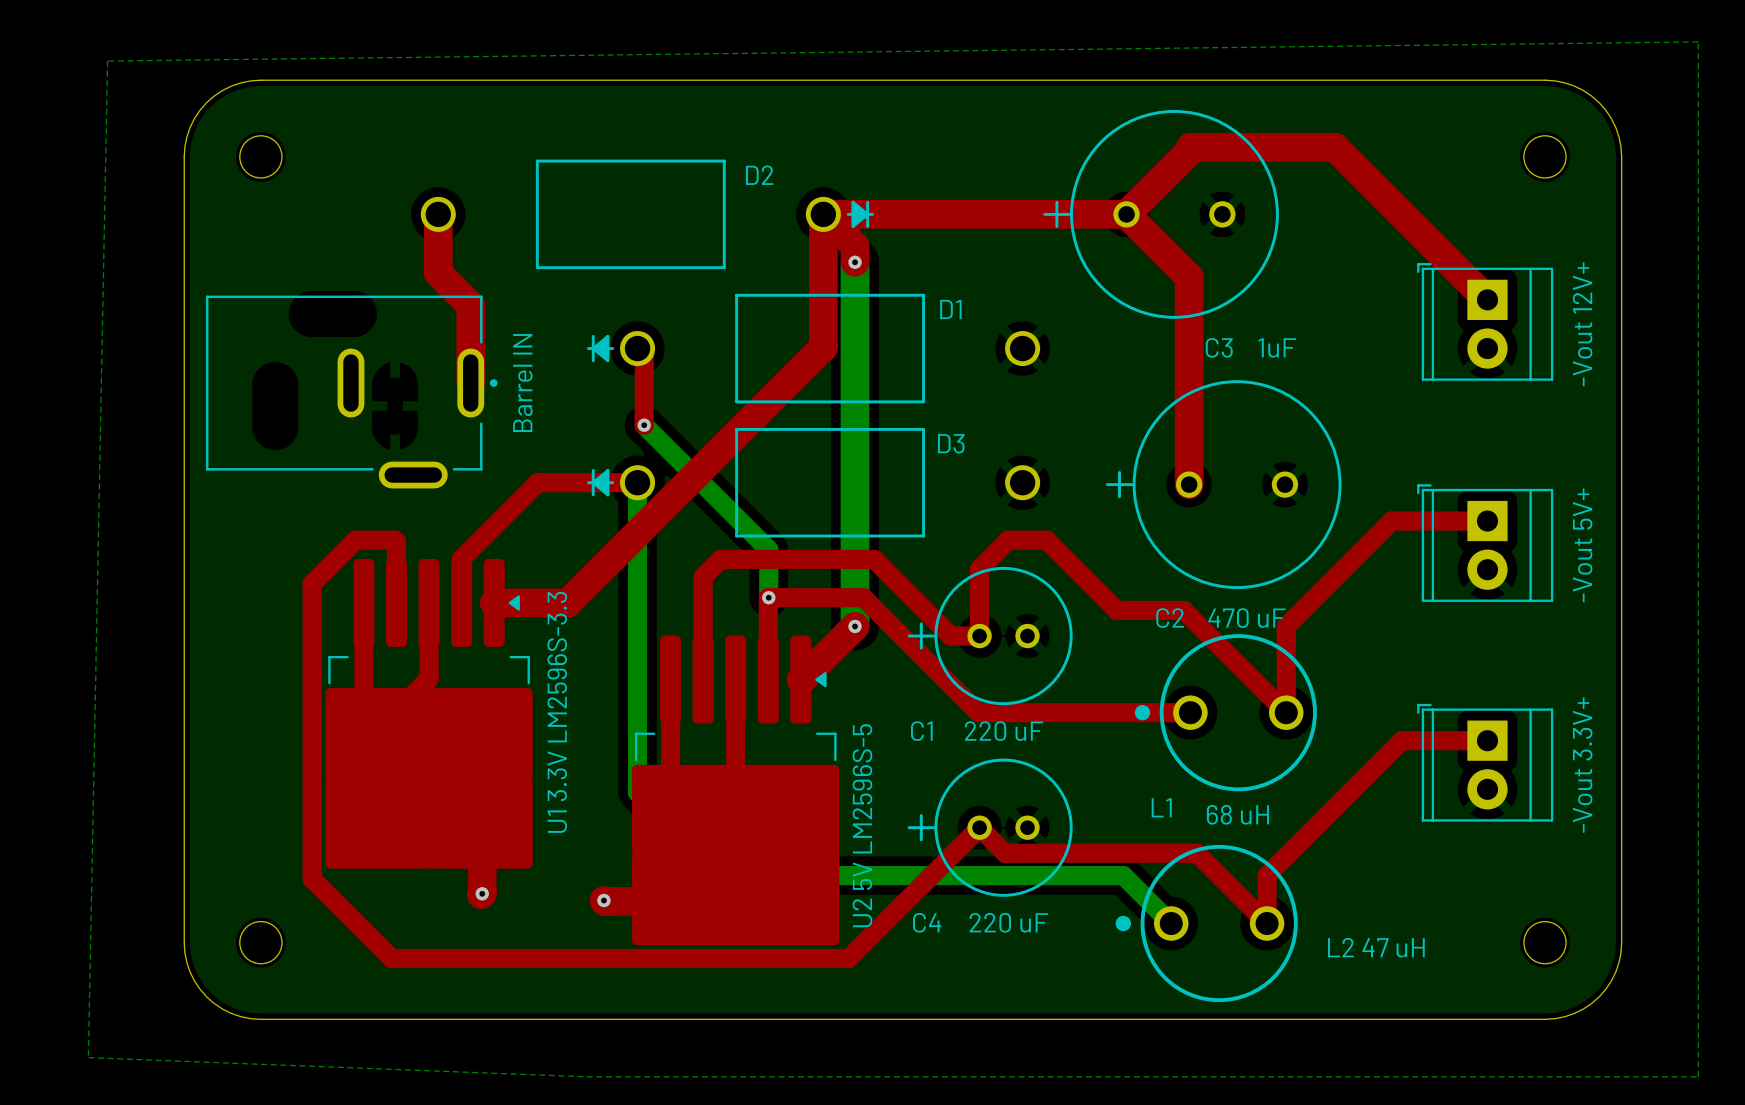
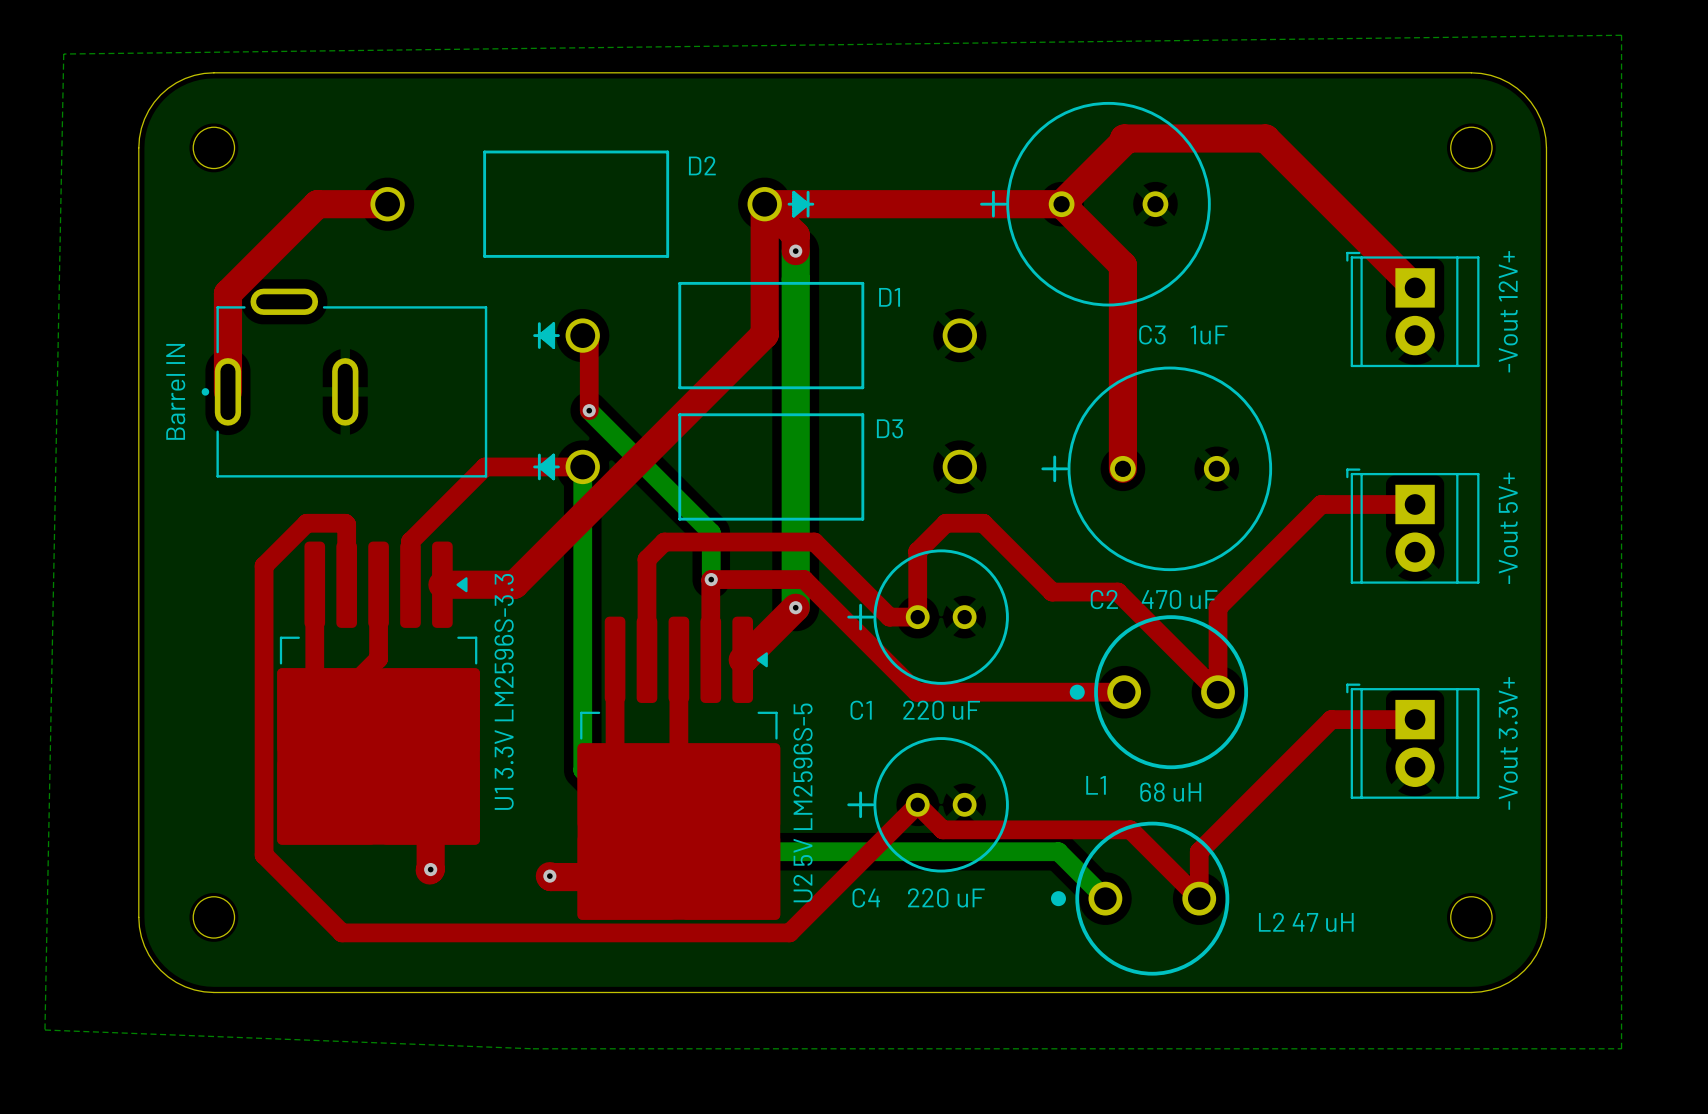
top track: (438, 214) (438, 272) (470, 305) (470, 383) -> (387, 204) (317, 204) (227, 293) (227, 391)
Barrel IN rotation: 0° (351, 392) -> 180° (344, 383)

